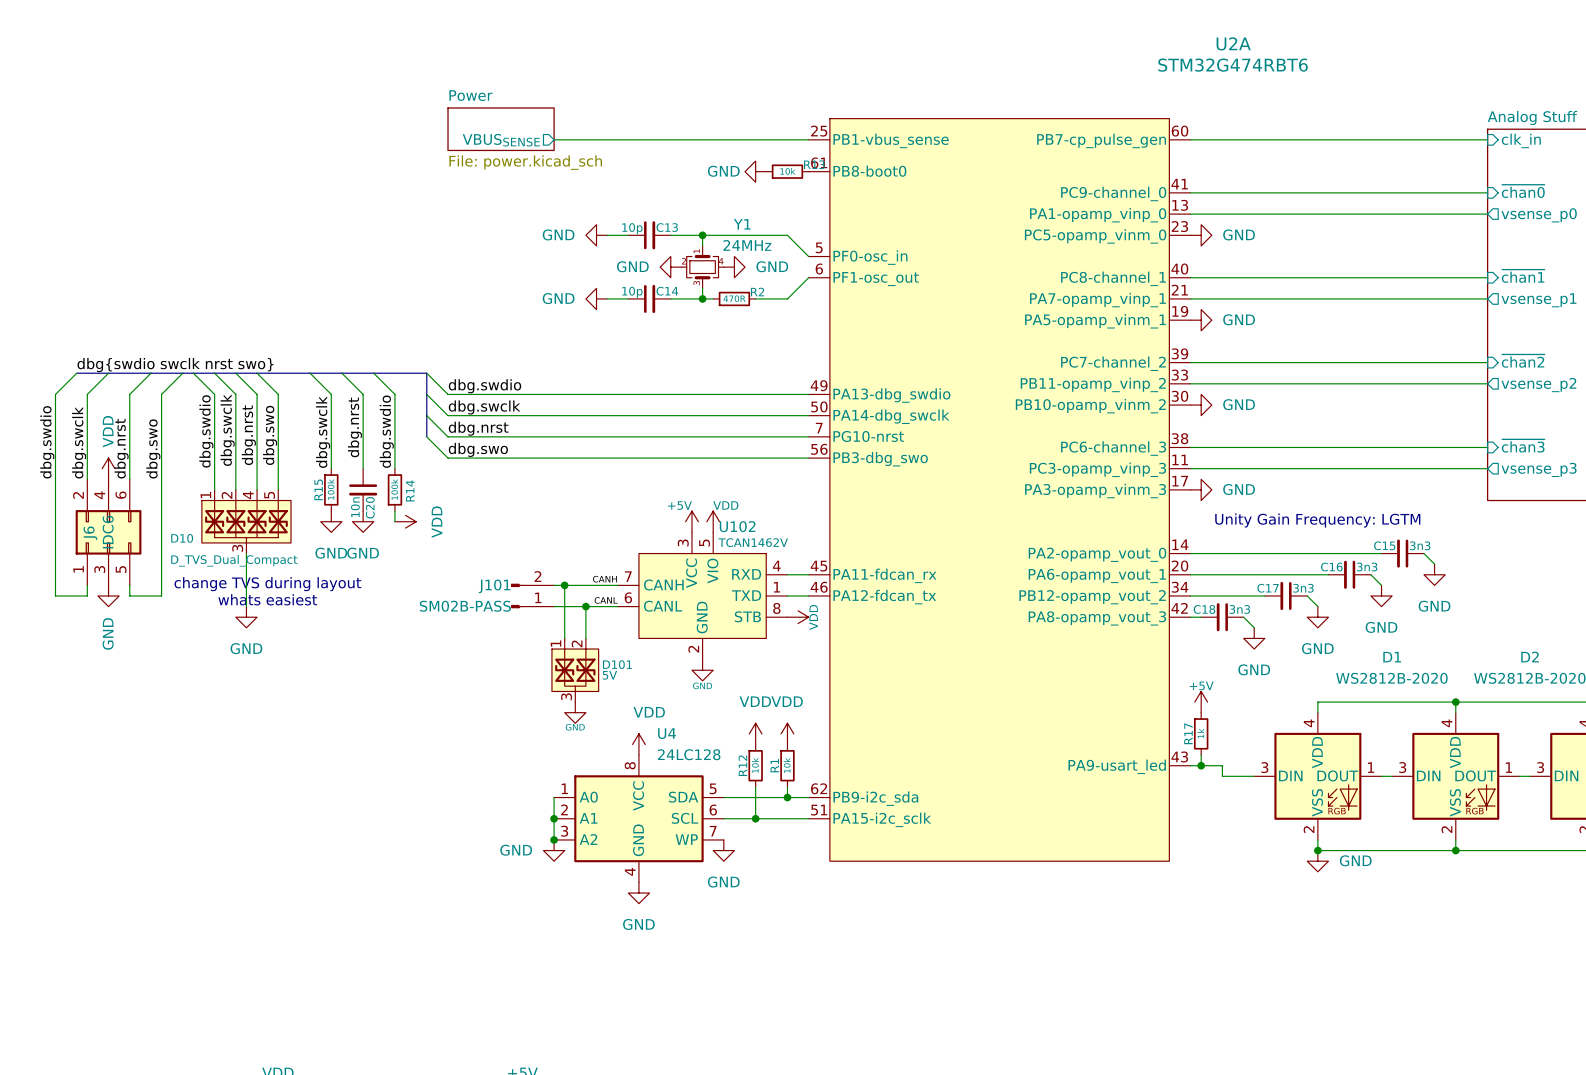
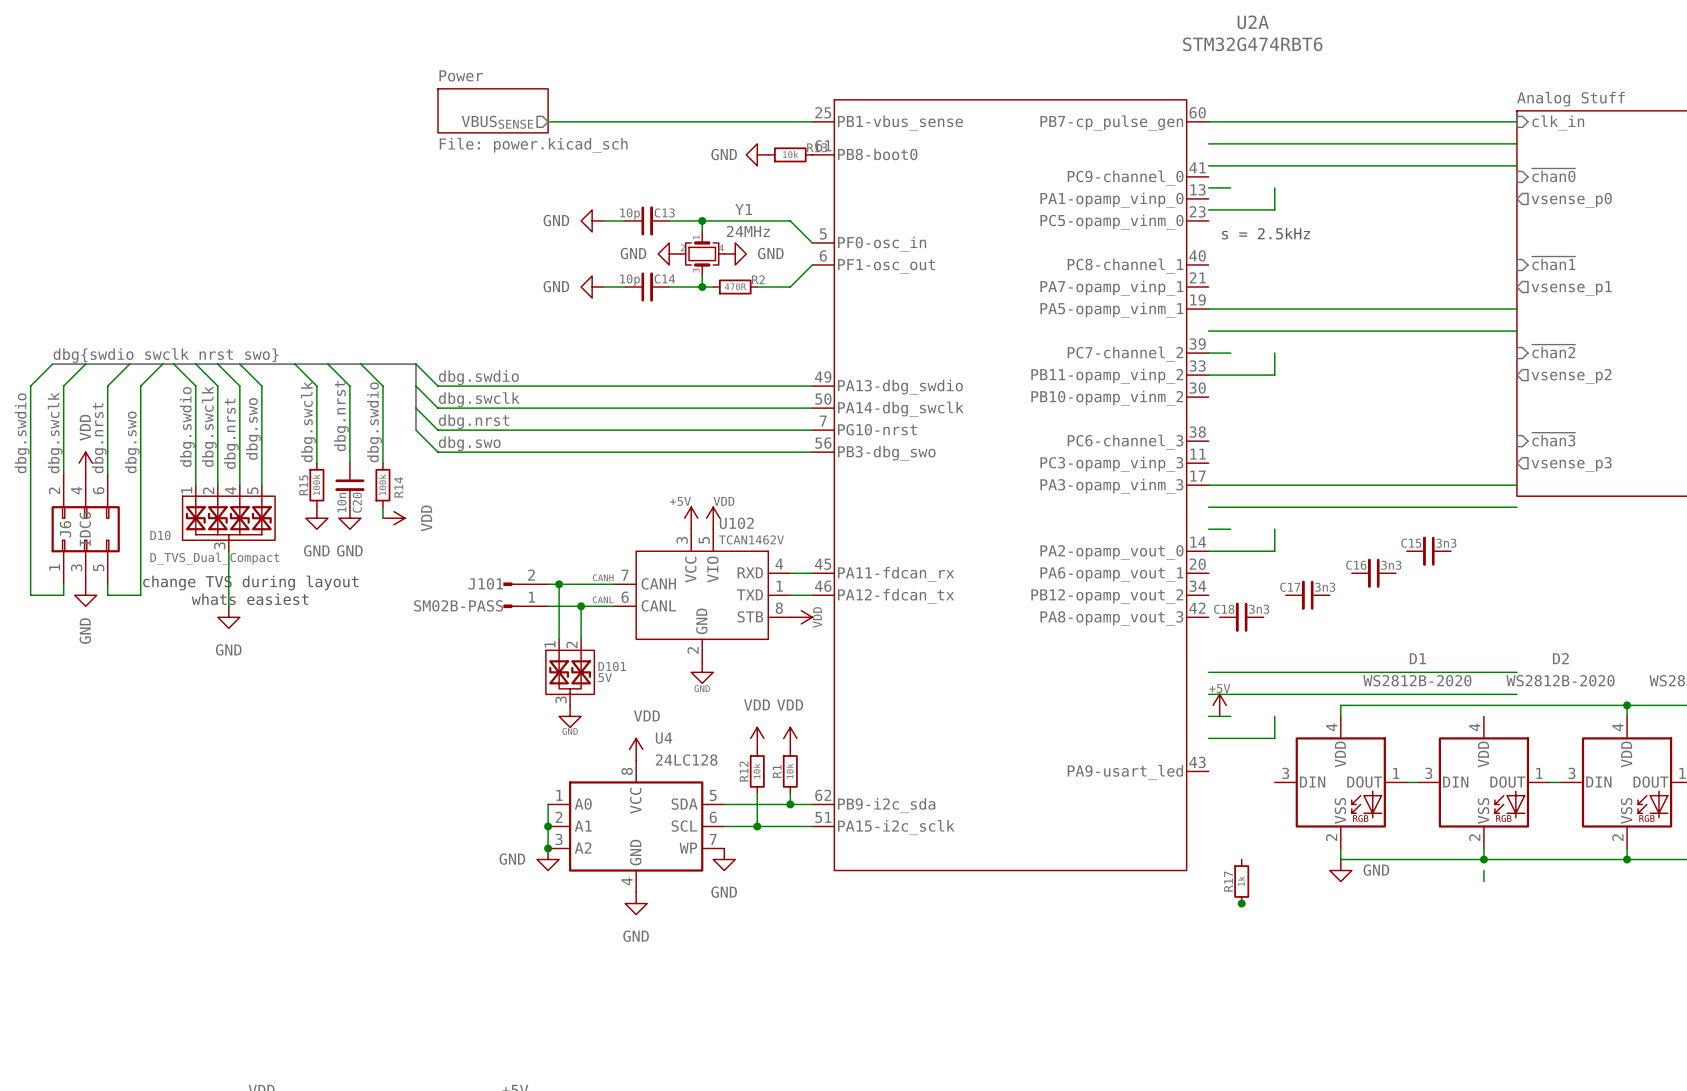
wire: (1190, 192) (1487, 192) -> (1208, 143) (1516, 143)
wire: none -> (1208, 187) (1230, 187)
wire: none -> (1274, 187) (1274, 209) (1208, 209)
wire: (1190, 214) (1487, 214) -> (1208, 165) (1516, 165)
power symbol: GND (1201, 235) -> none
text: none -> s = 2.5kHz (1266, 233)
wire: (1190, 277) (1487, 277) -> (1208, 309) (1516, 309)
wire: (1190, 298) (1487, 298) -> (1208, 331) (1516, 331)
power symbol: GND (1201, 320) -> none
wire: (1211, 362) (1487, 362) -> none
wire: (1254, 383) (1487, 383) -> (1274, 375) (1274, 353)
power symbol: GND (1201, 405) -> none
wire: (1190, 447) (1487, 447) -> (1208, 485) (1516, 485)
wire: (1190, 468) (1487, 468) -> (1208, 507) (1516, 507)
power symbol: GND (1201, 489) -> none
text: Unity Gain Frequency: LGTM (1317, 520) -> none
wire: none -> (1208, 529) (1230, 529)
wire: (1254, 553) (1381, 553) -> (1274, 551) (1274, 529)
wire: (1423, 553) (1434, 564) -> none
wire: (1190, 574) (1328, 574) -> none
wire: (1370, 574) (1381, 585) -> none
power symbol: GND (1434, 574) -> none
wire: (1190, 595) (1264, 595) -> none
wire: (1307, 595) (1317, 606) -> none
power symbol: GND (1381, 595) -> none
wire: (1190, 617) (1201, 617) -> none
wire: (1243, 617) (1254, 627) -> none
power symbol: GND (1317, 617) -> none
power symbol: GND (1254, 638) -> none
wire: none -> (1208, 672) (1516, 672)
wire: none -> (1208, 694) (1516, 694)
wire: (1455, 702) (1455, 712) -> (1483, 870) (1483, 881)
junction: (1455, 702) -> none
wire: none -> (1208, 716) (1230, 716)
wire: none -> (1274, 716) (1274, 738) (1208, 738)
R17 position: (1201, 733) -> (1241, 881)
wire: (1201, 755) (1201, 765) -> none
wire: (1190, 765) (1222, 765) (1222, 776) (1254, 776) -> none
junction: (1201, 765) -> none
junction: (1317, 850) -> none
junction: none -> (1241, 903)

